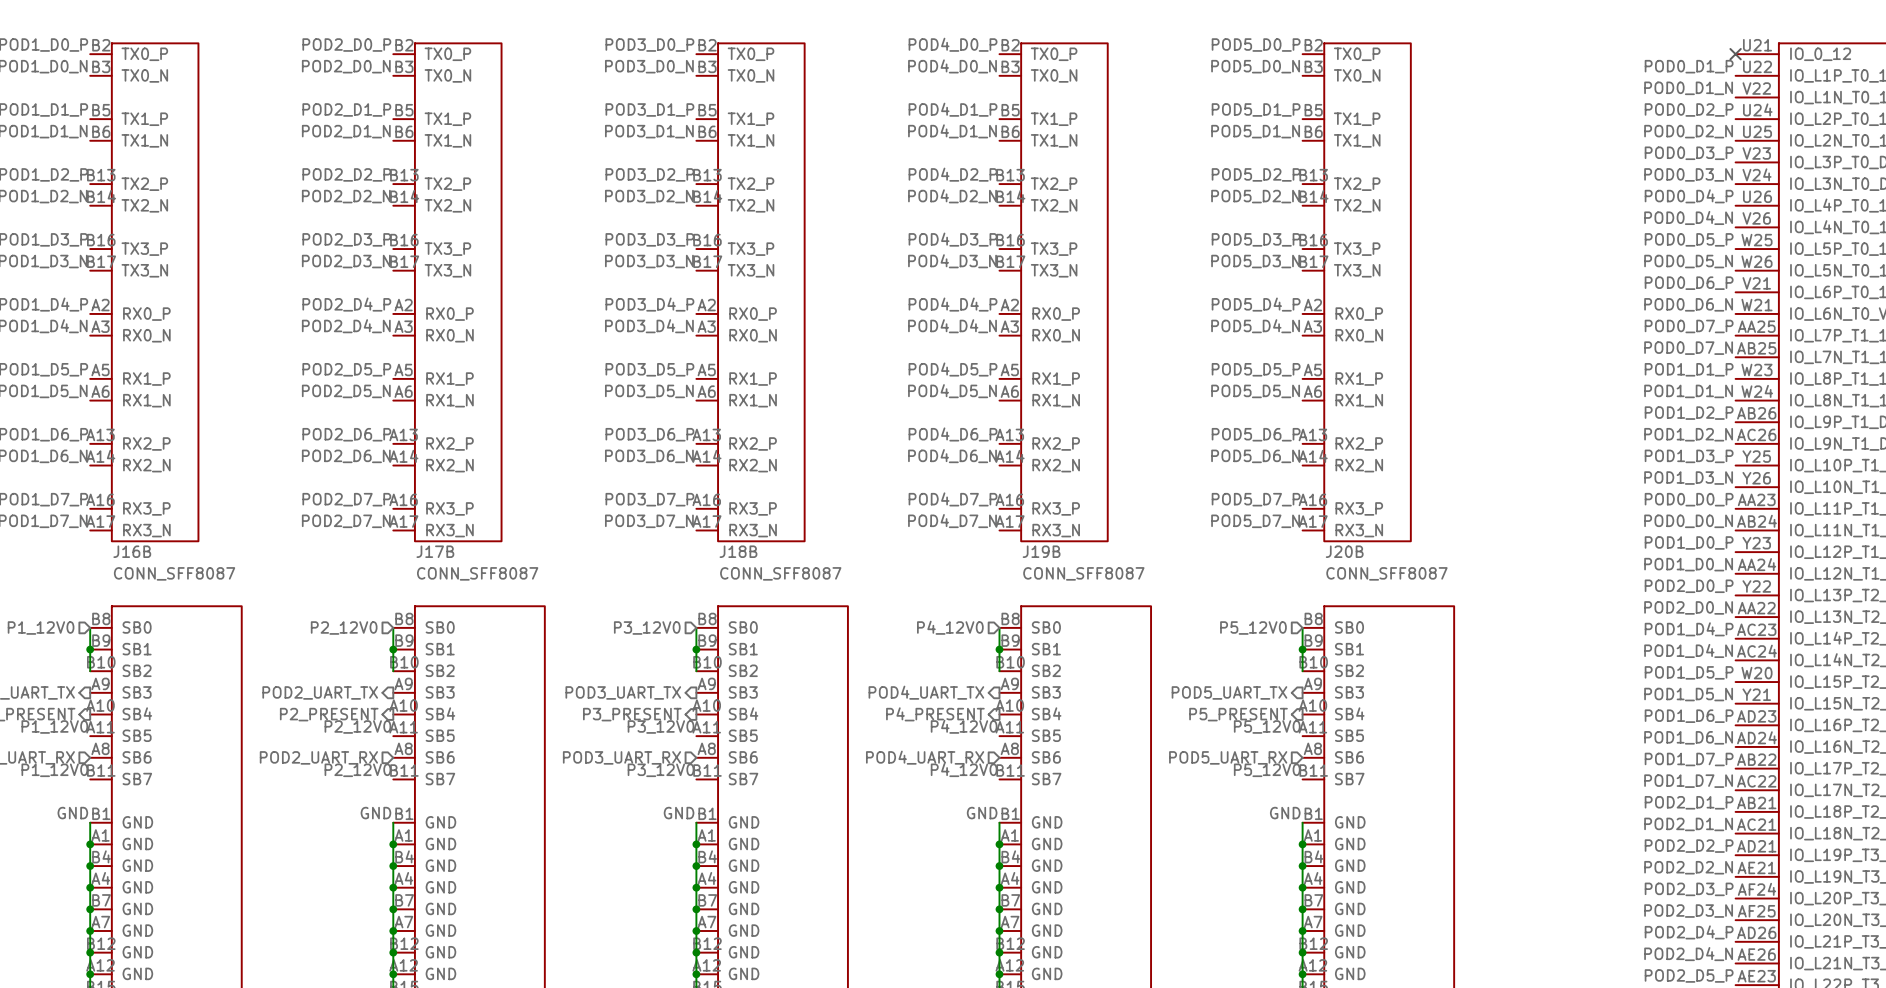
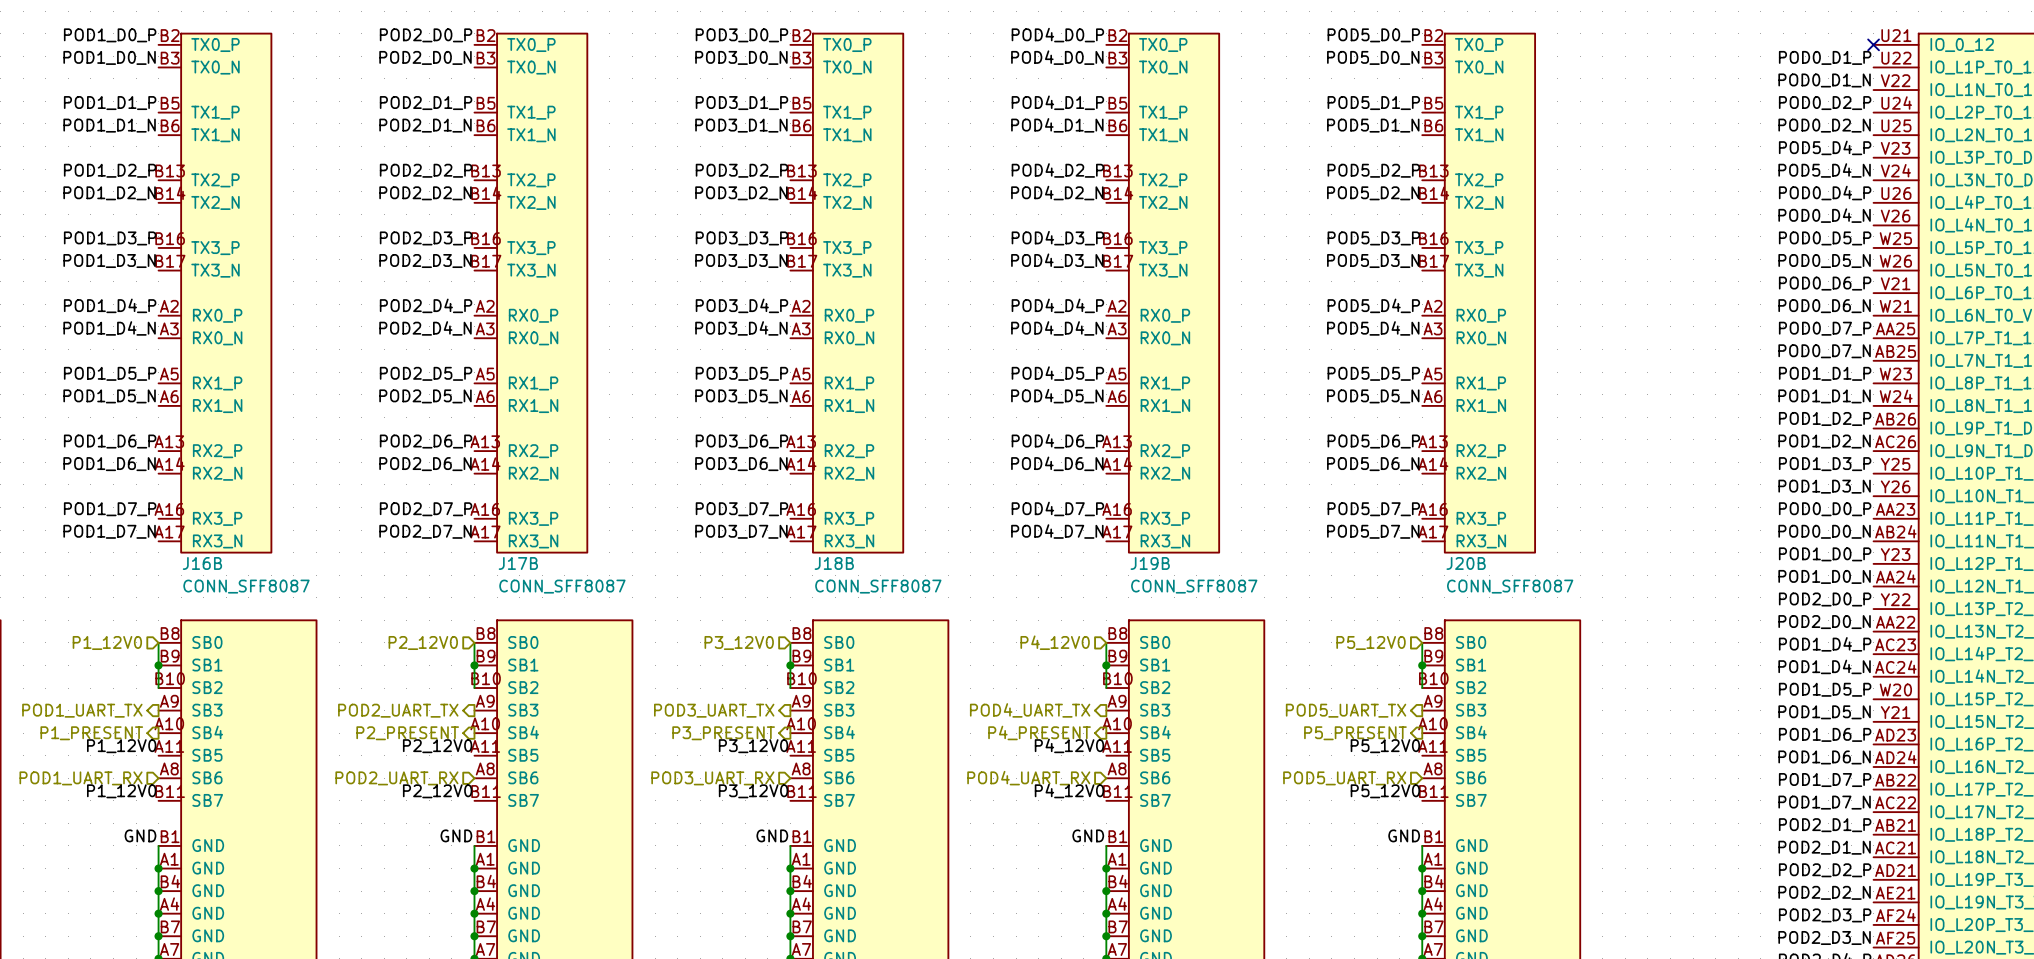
label: POD0_D3_P (1689, 153) -> POD5_D4_P (1825, 147)
label: POD0_D3_N (1688, 174) -> POD5_D4_N (1824, 170)

